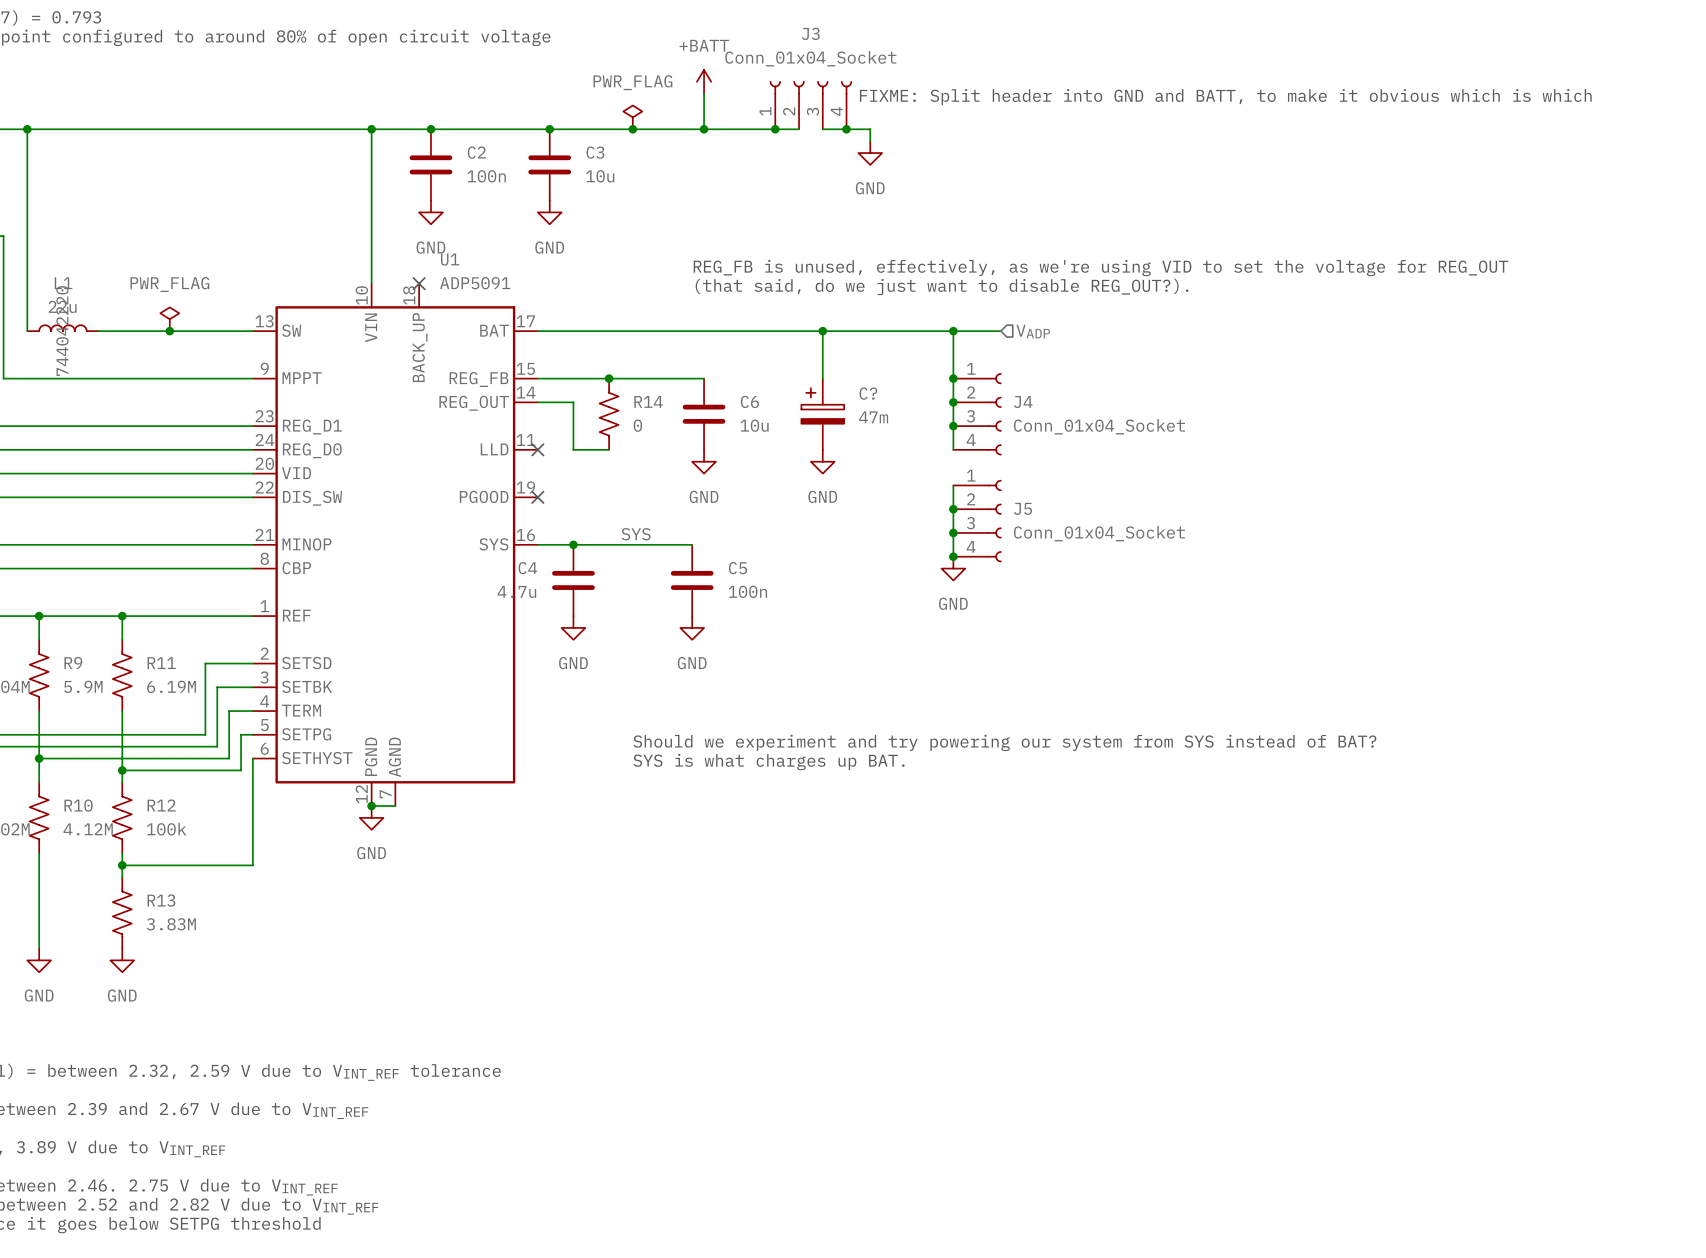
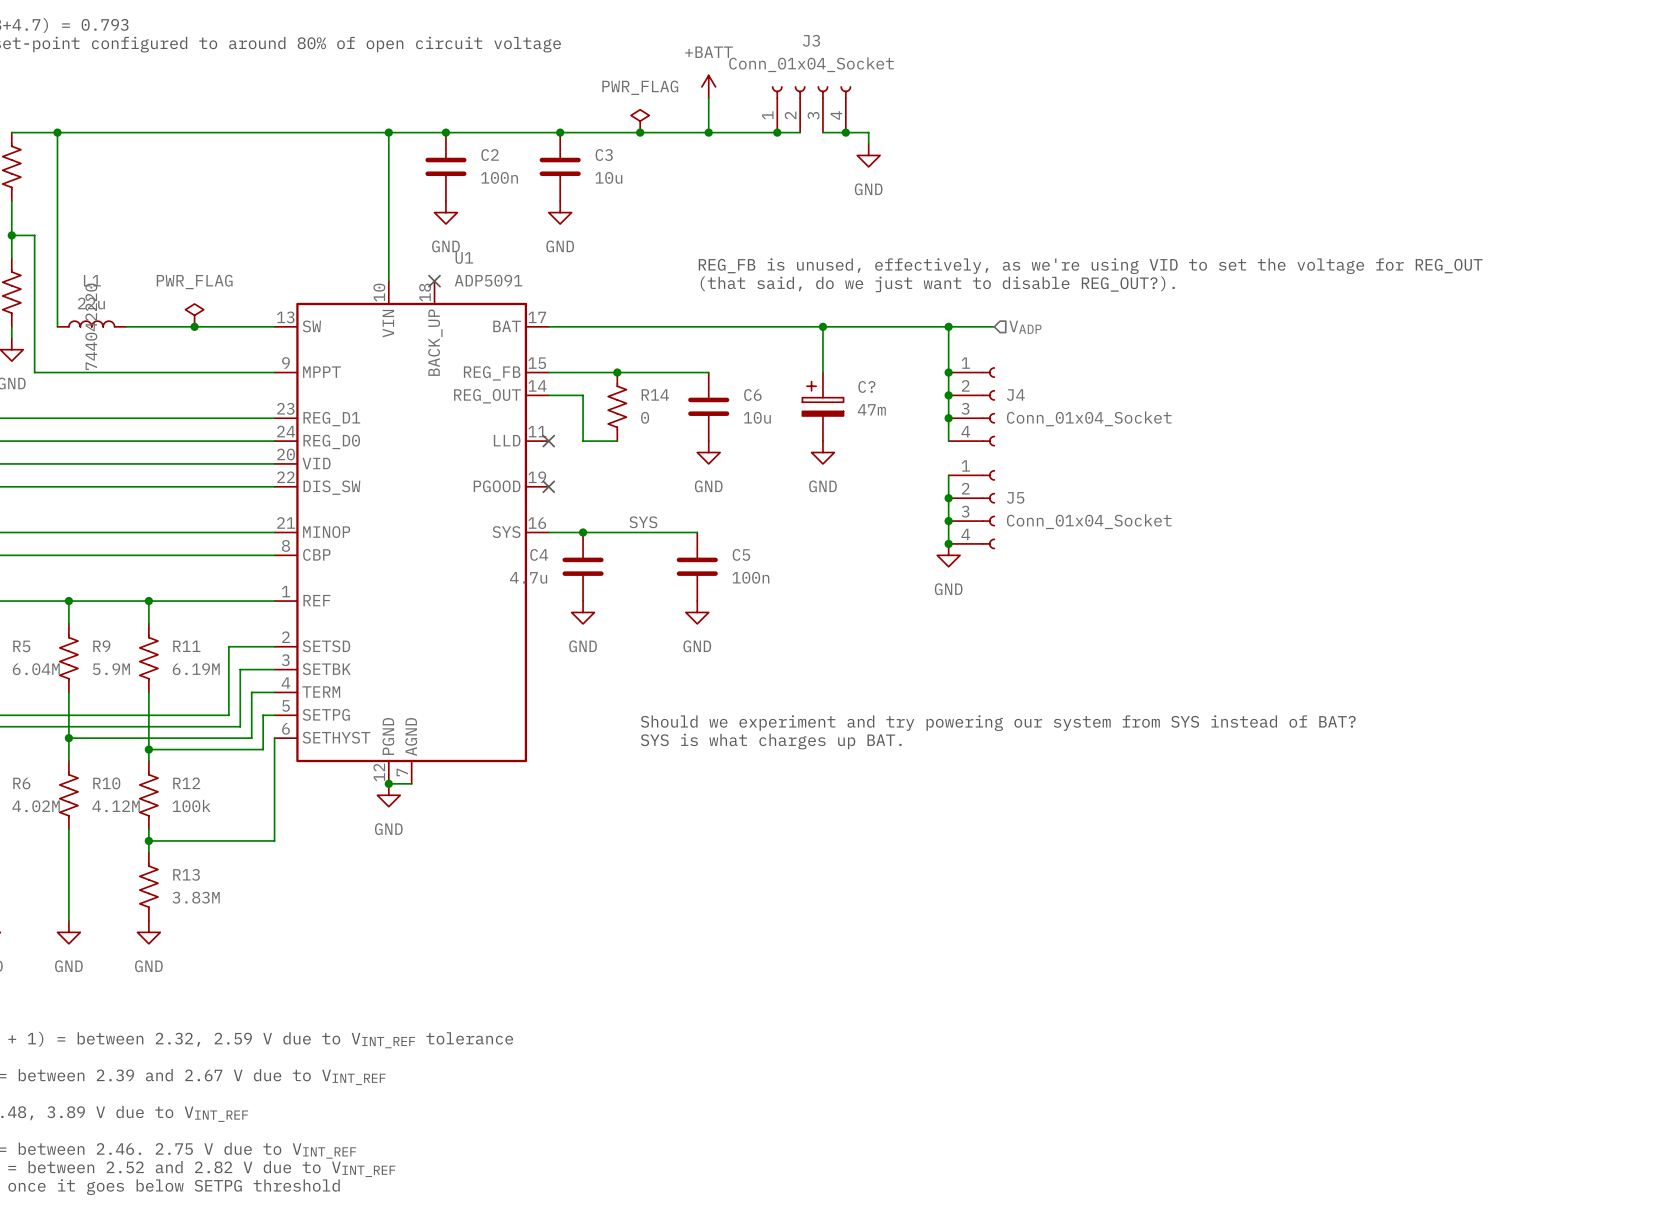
text: FIXME: Split header into GND and BATT, to make it obvious which is which (1225, 97) -> none

